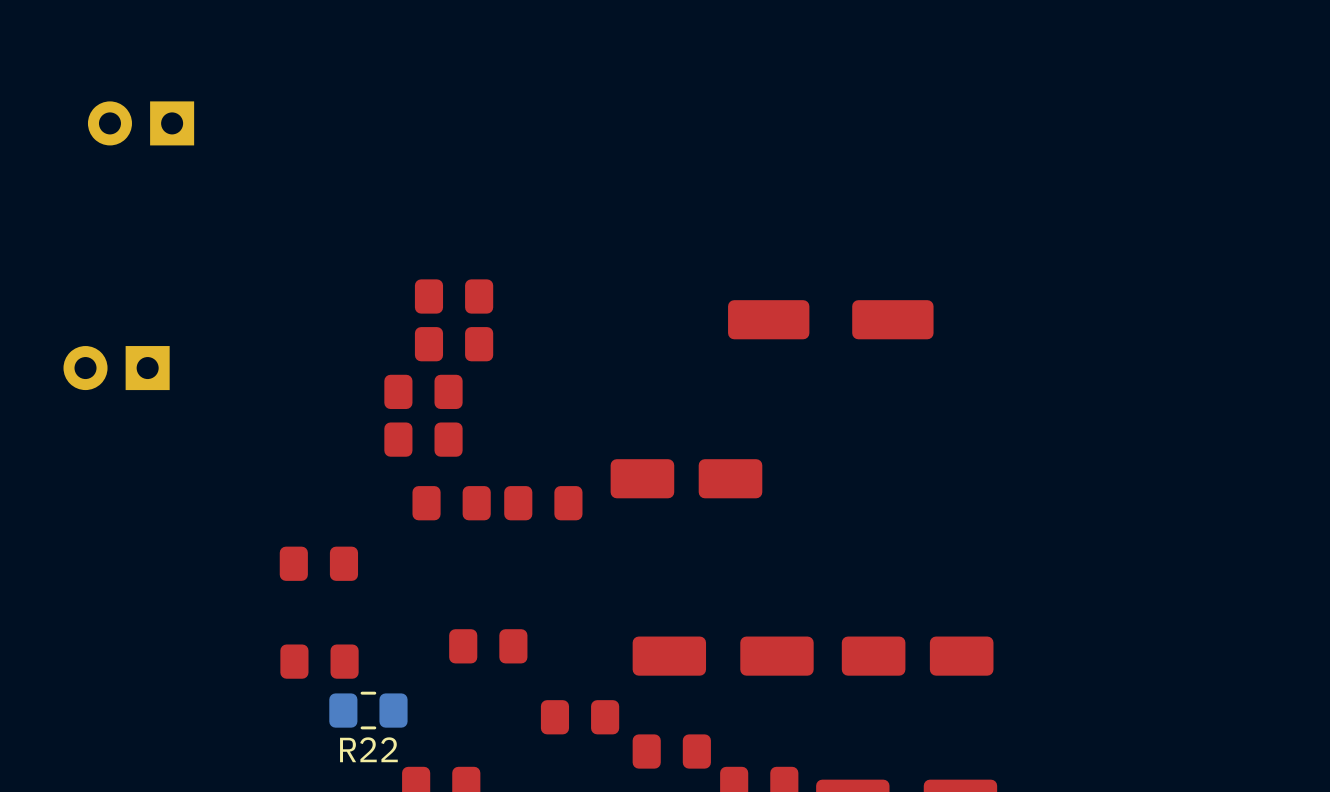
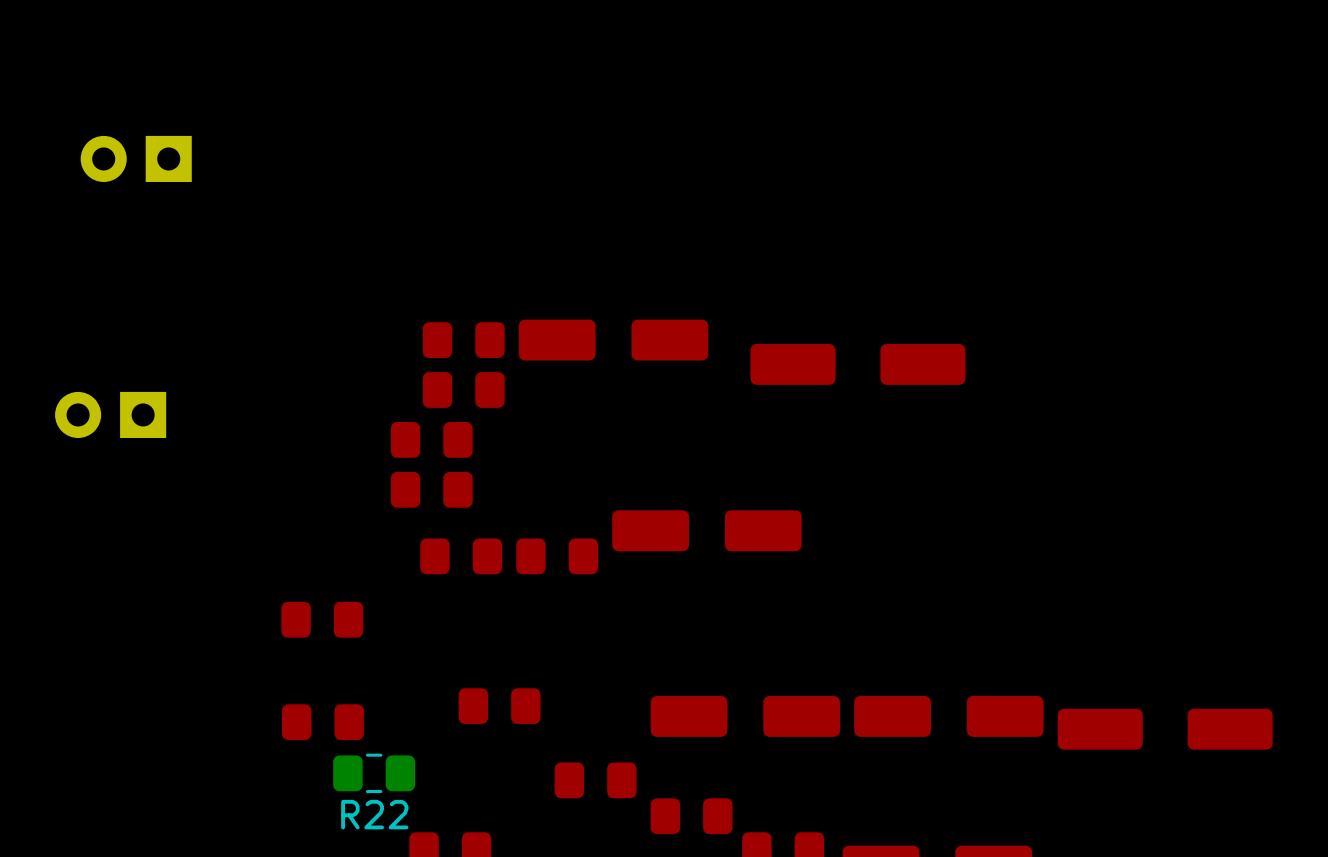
part: none -> (613, 340)
part footprint: [610, 459, 763, 499] -> [612, 510, 802, 552]
part footprint: [841, 636, 994, 676] -> [854, 695, 1044, 737]
part: none -> (1165, 729)

